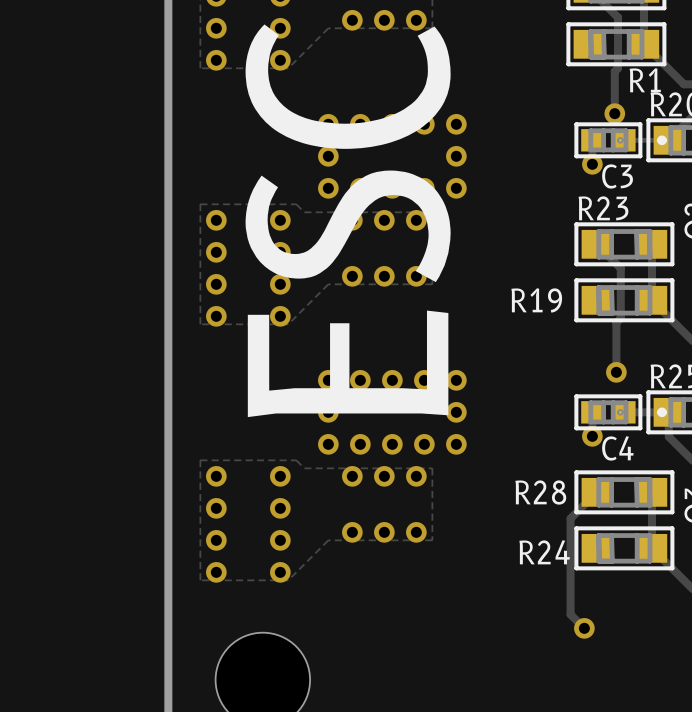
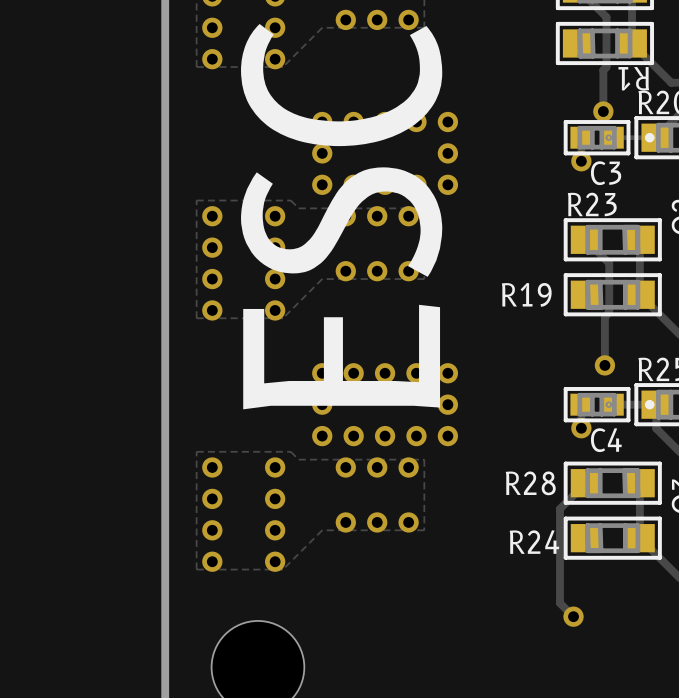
R1 name rotation: 0° (645, 80) -> 180° (633, 78)

